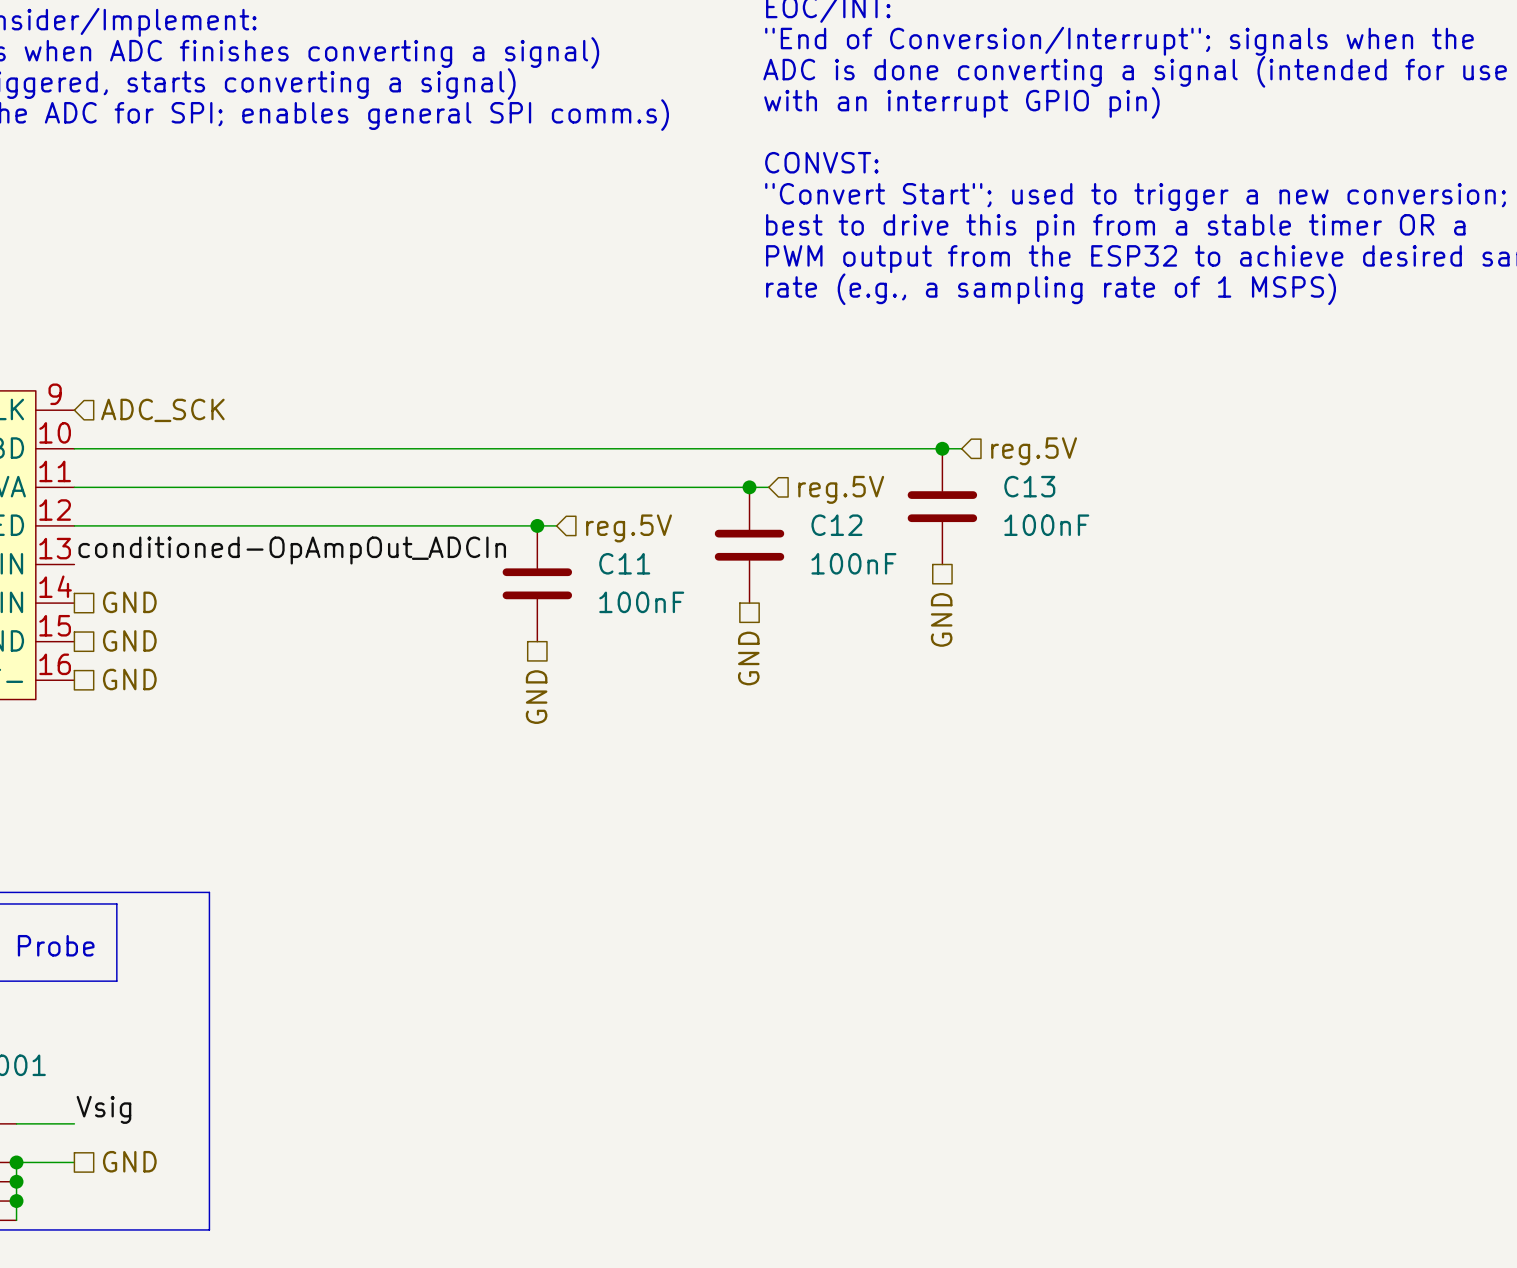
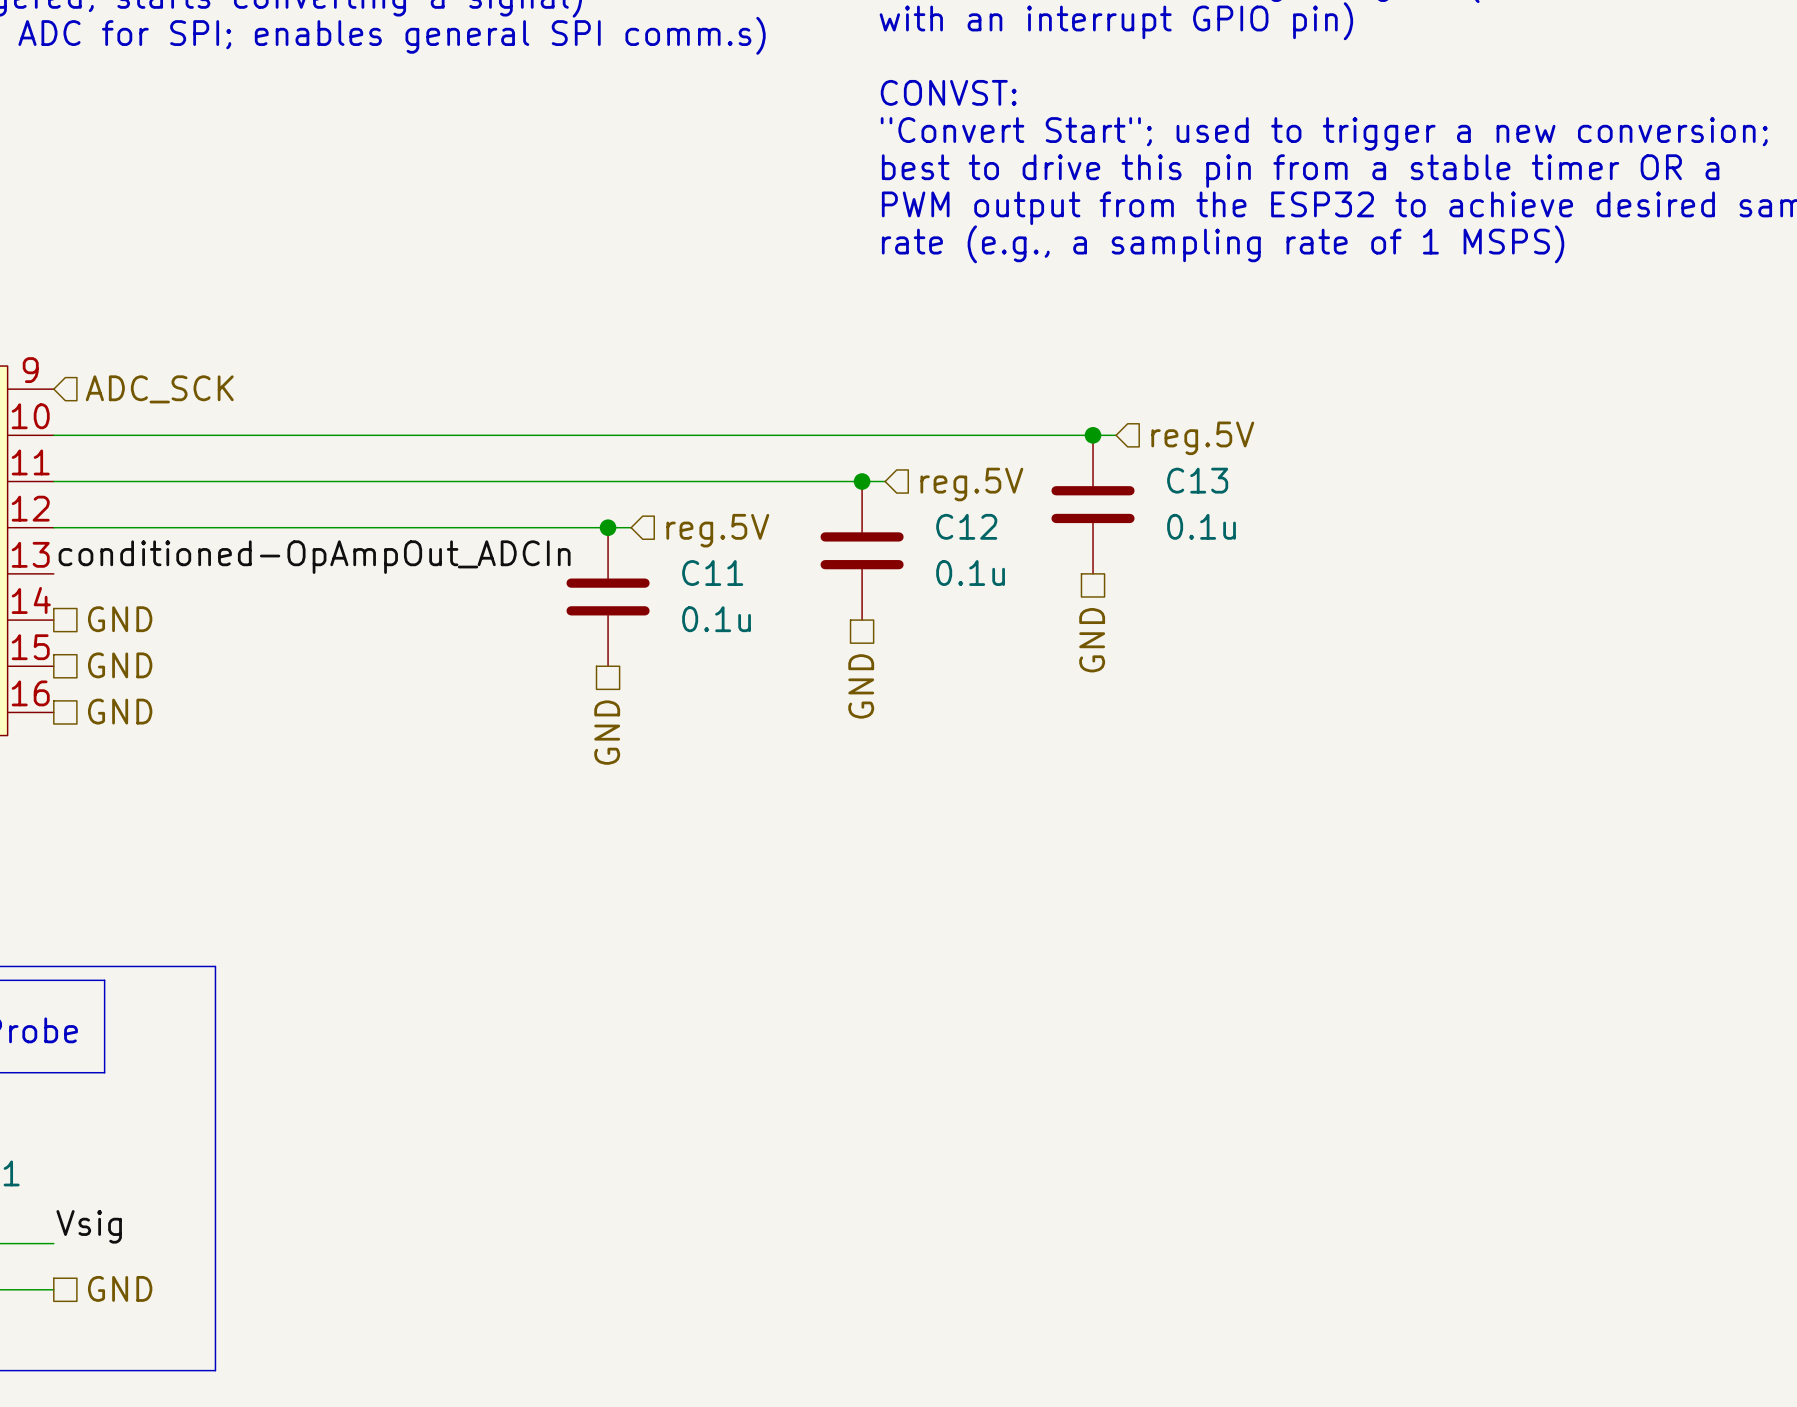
C13 value: 100nF (1046, 525) -> 0.1u (1201, 526)
C12 value: 100nF (853, 563) -> 0.1u (970, 573)
C11 value: 100nF (641, 602) -> 0.1u (716, 619)

